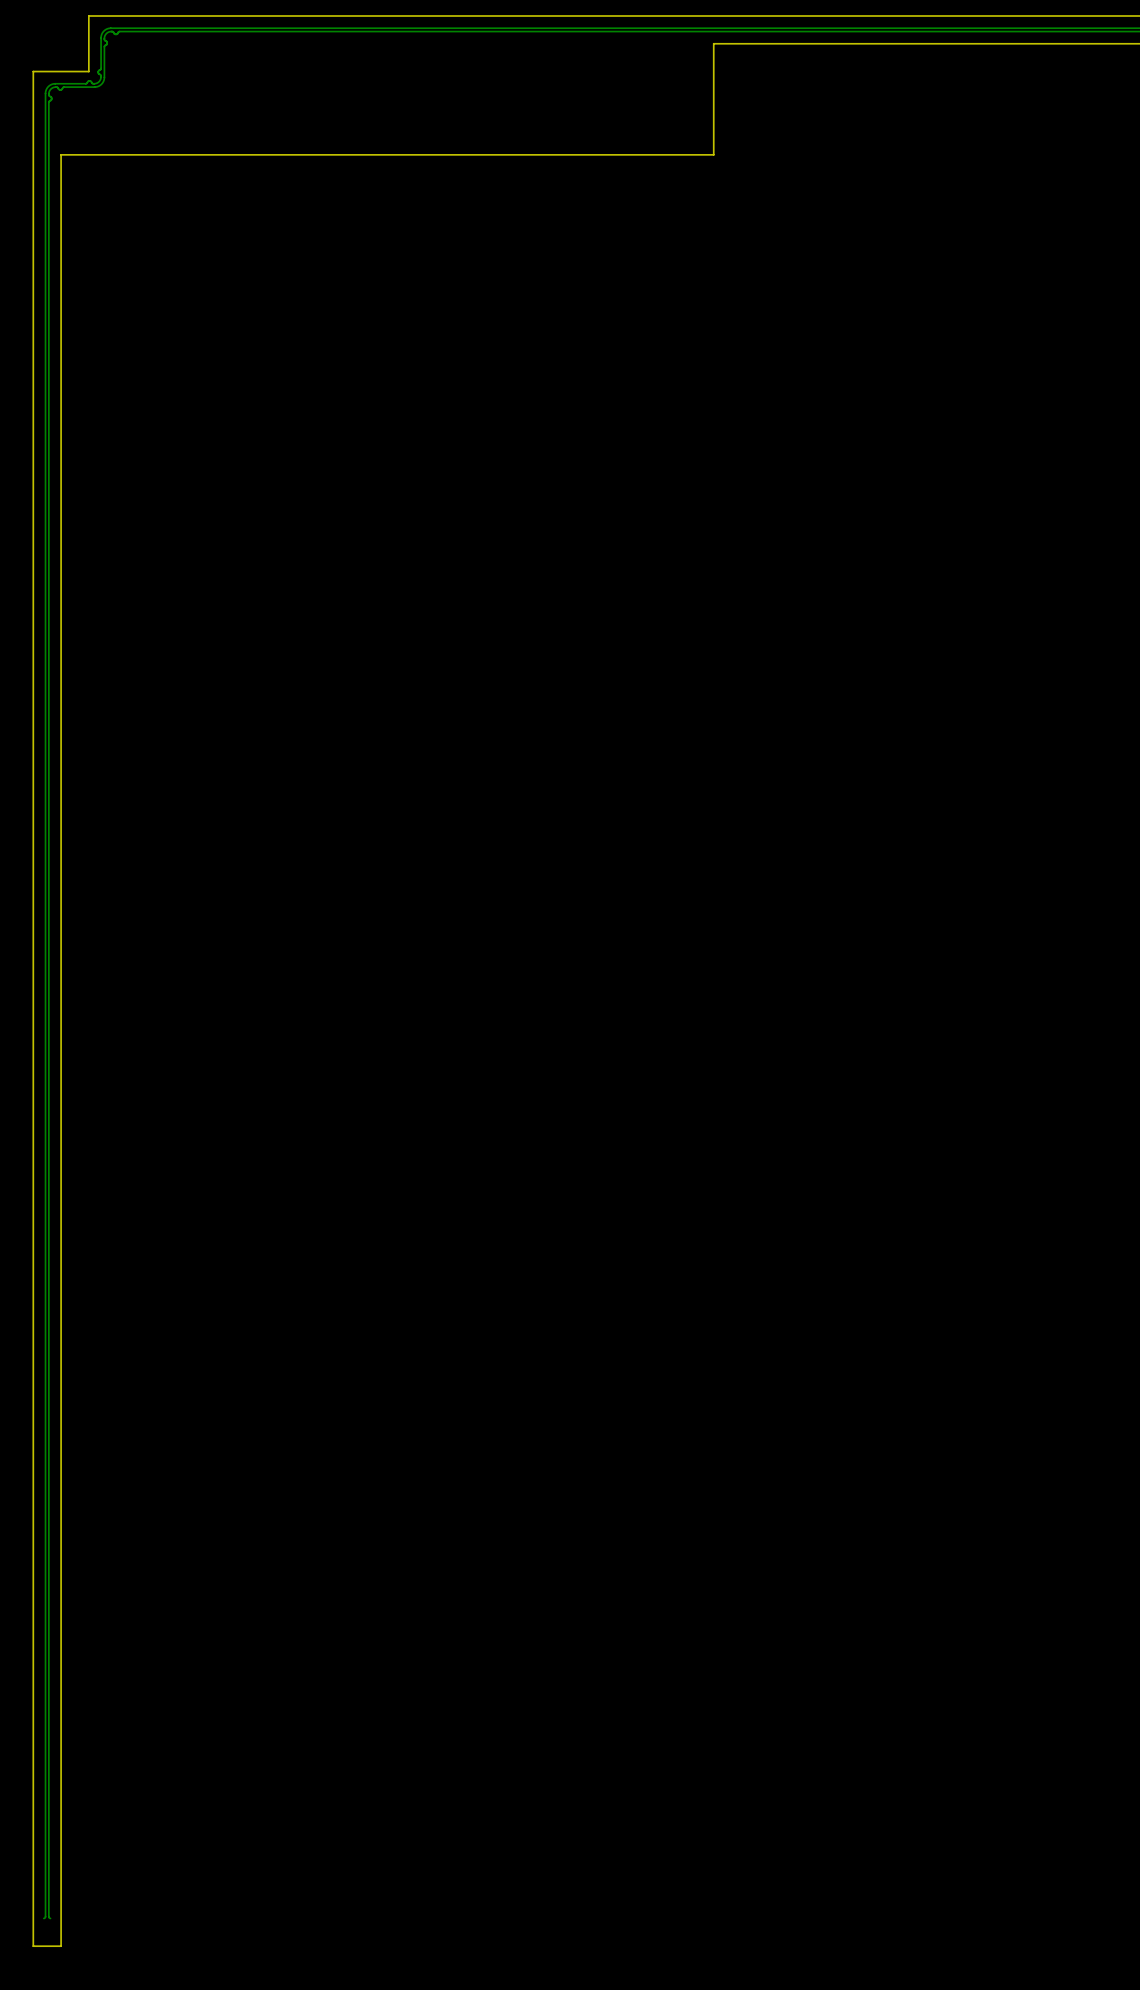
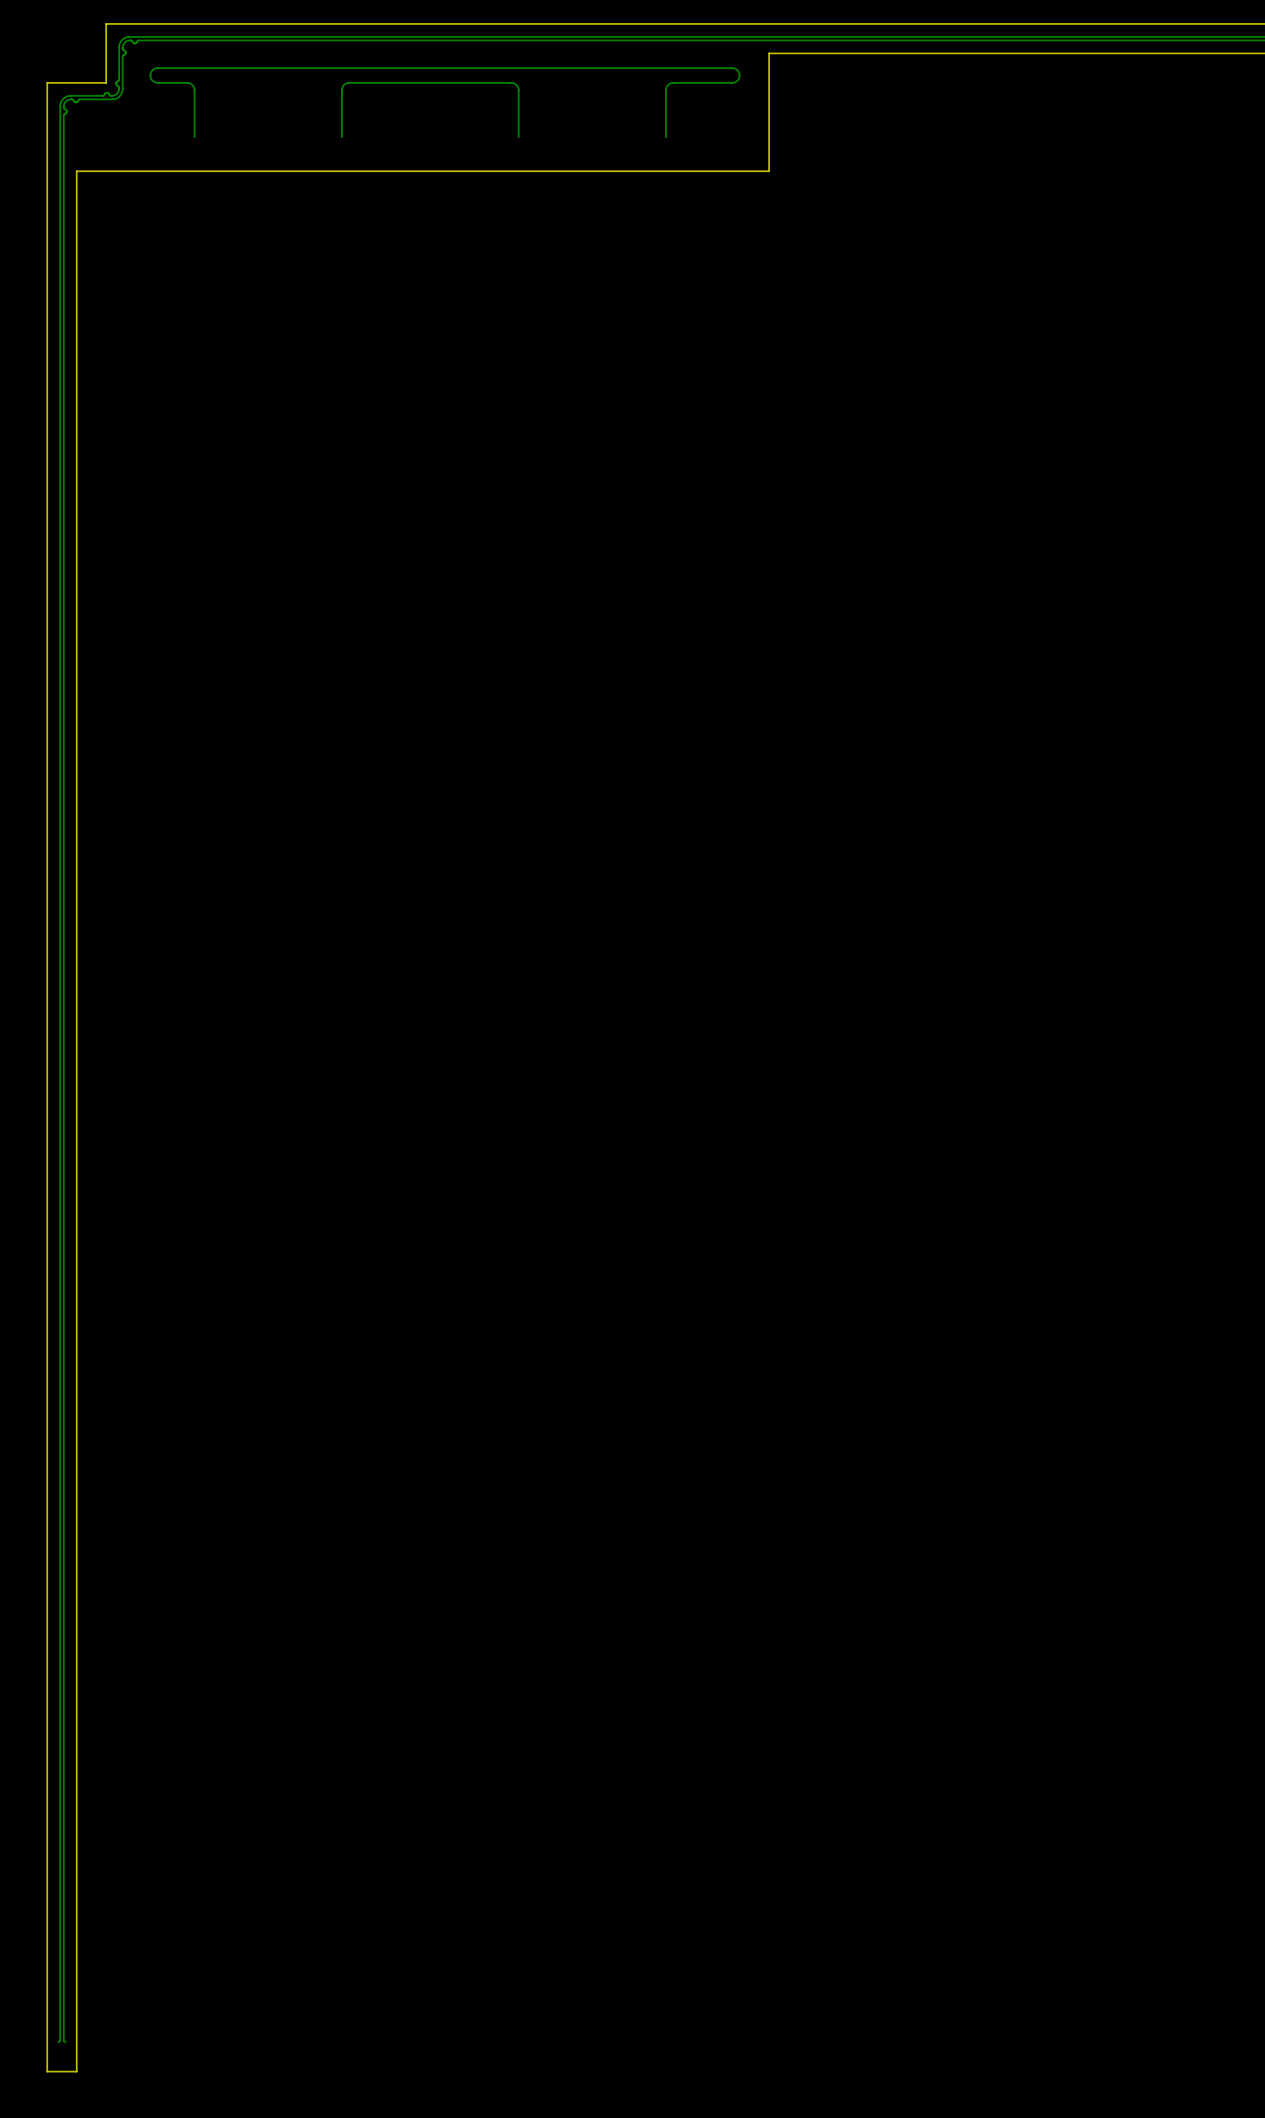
track: none -> (518, 137) (518, 89) (515, 84) (511, 82) (347, 83) (341, 89) (341, 137)
track: none -> (665, 137) (665, 90) (668, 85) (673, 82) (734, 82) (739, 77) (737, 70) (732, 68) (154, 69) (150, 75) (154, 82) (188, 82) (193, 86) (194, 137)

